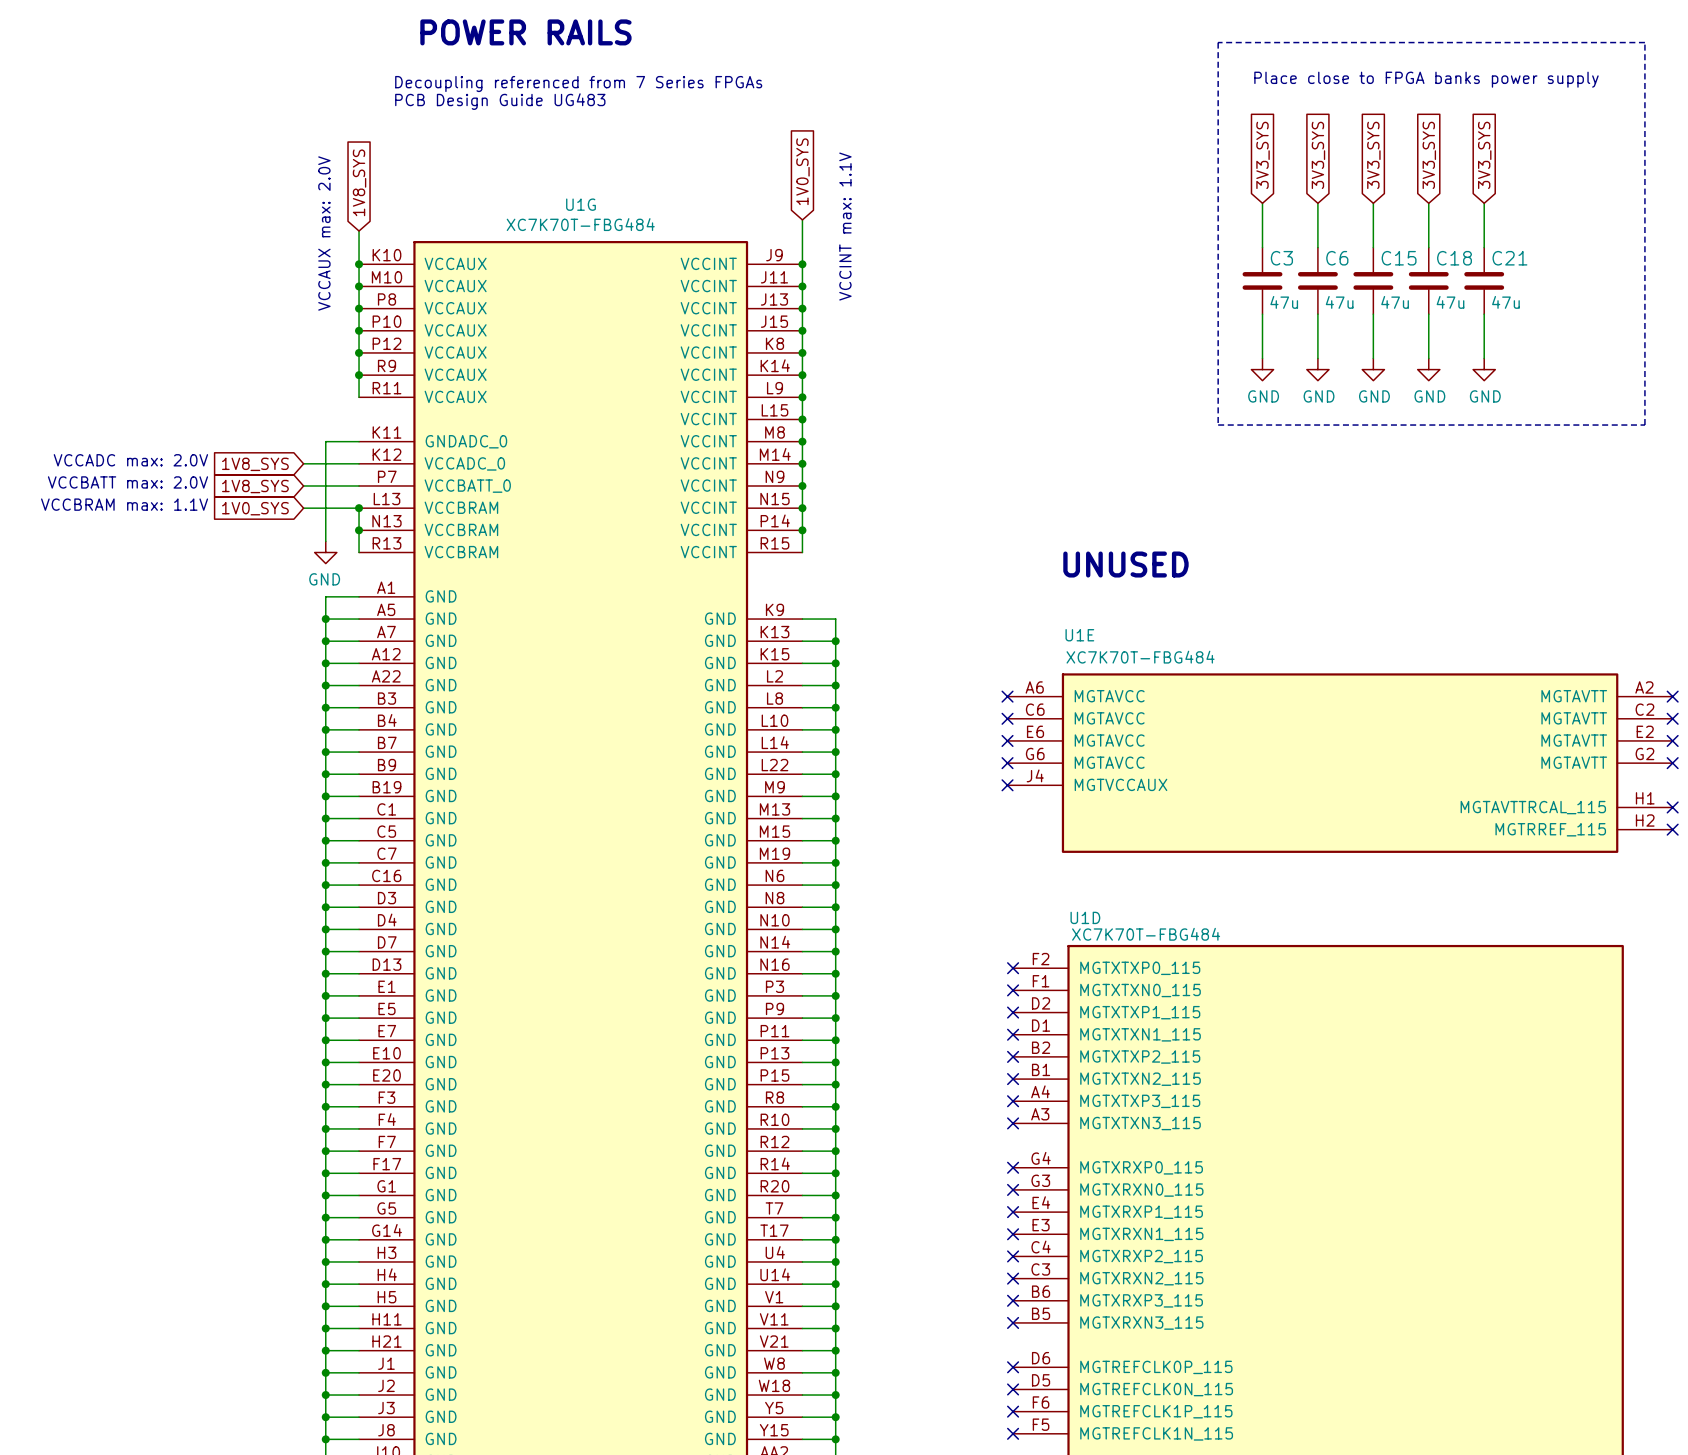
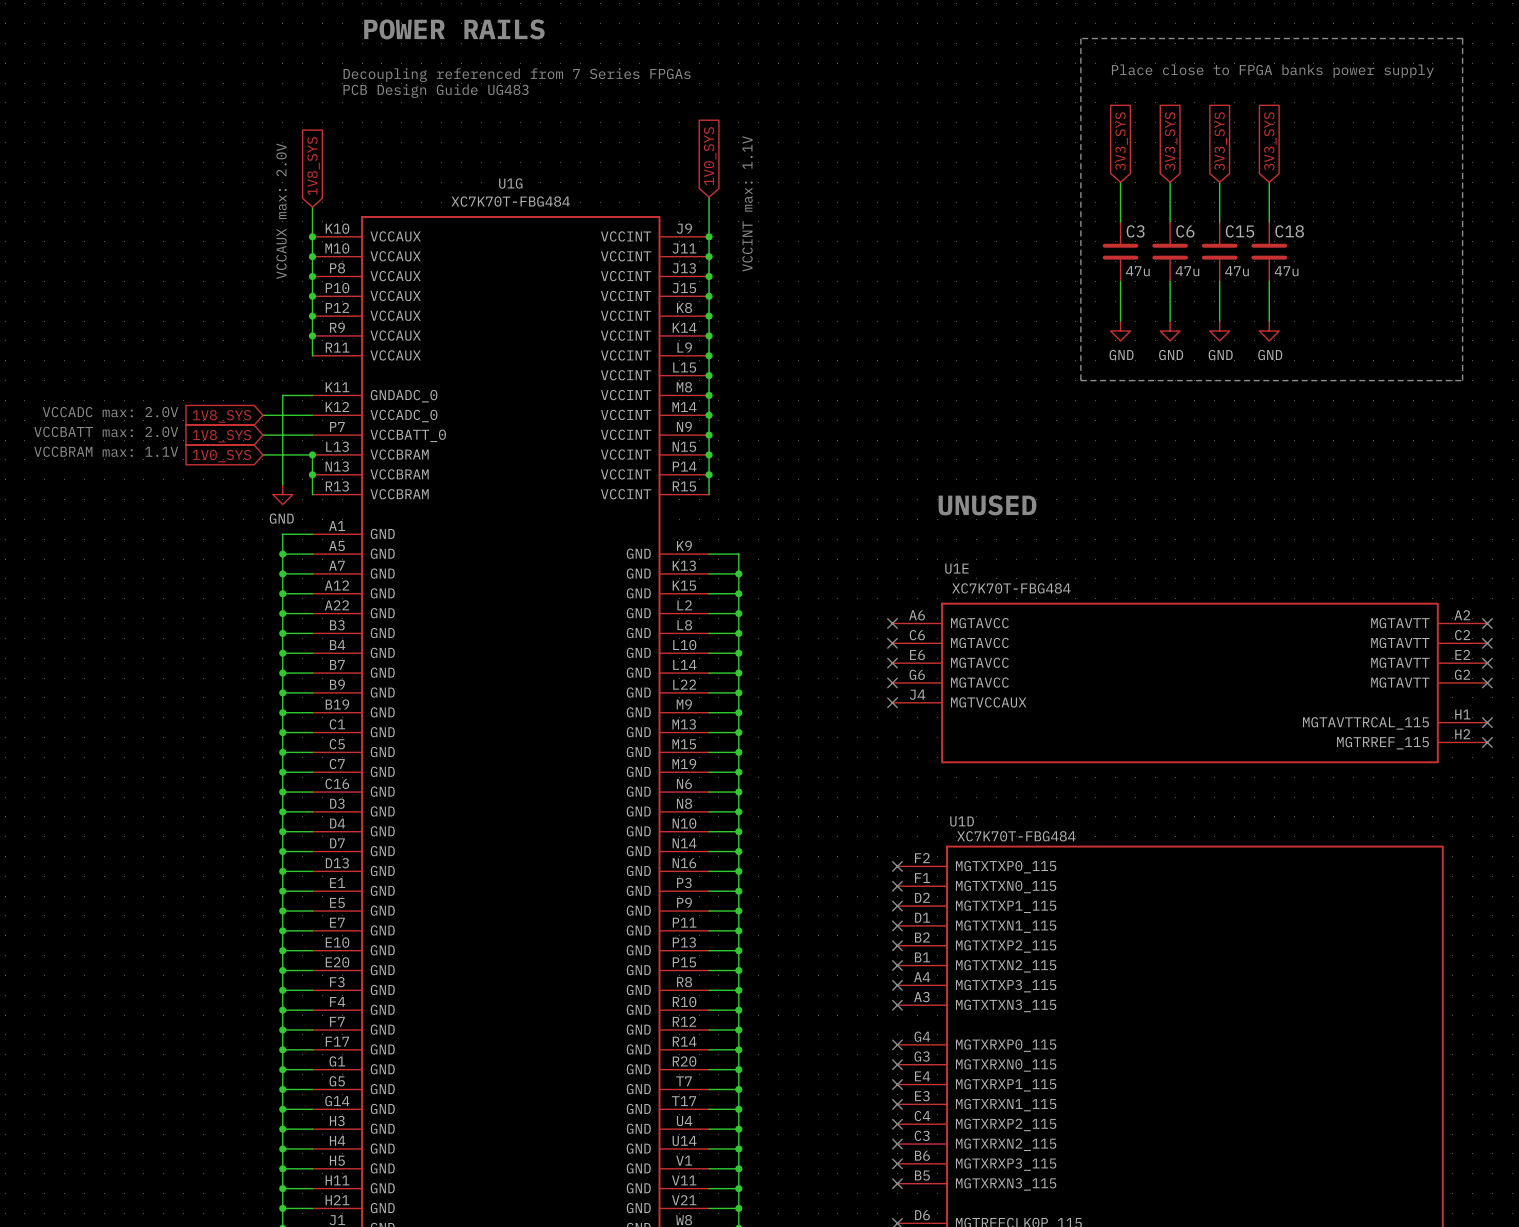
global label: 3V3_SYS (1484, 155) -> none
wire: (1484, 203) (1484, 247) -> none
C21: (1484, 280) -> none
wire: (1484, 314) (1484, 358) -> none
power symbol: GND (1484, 369) -> none

